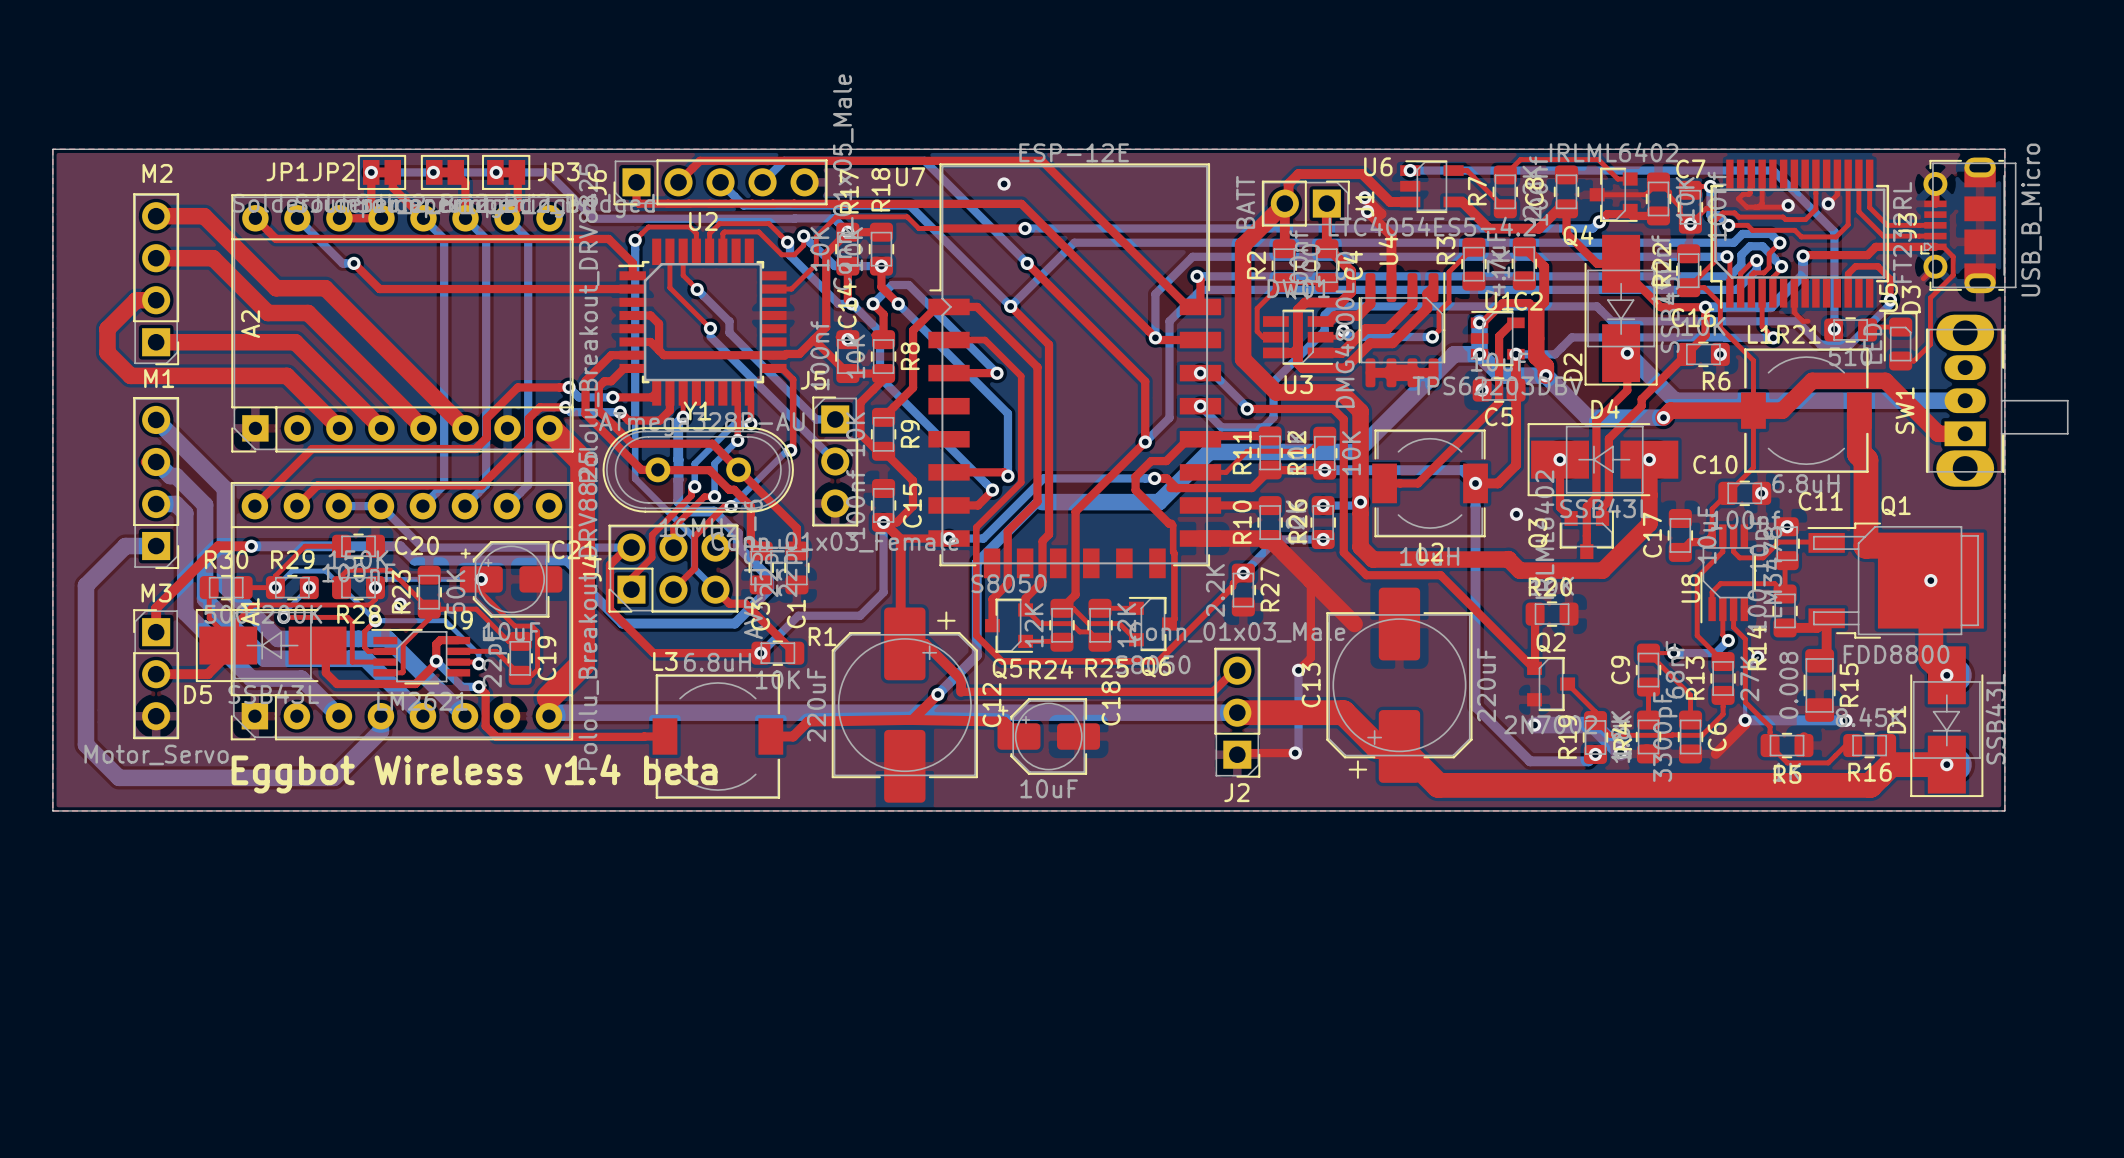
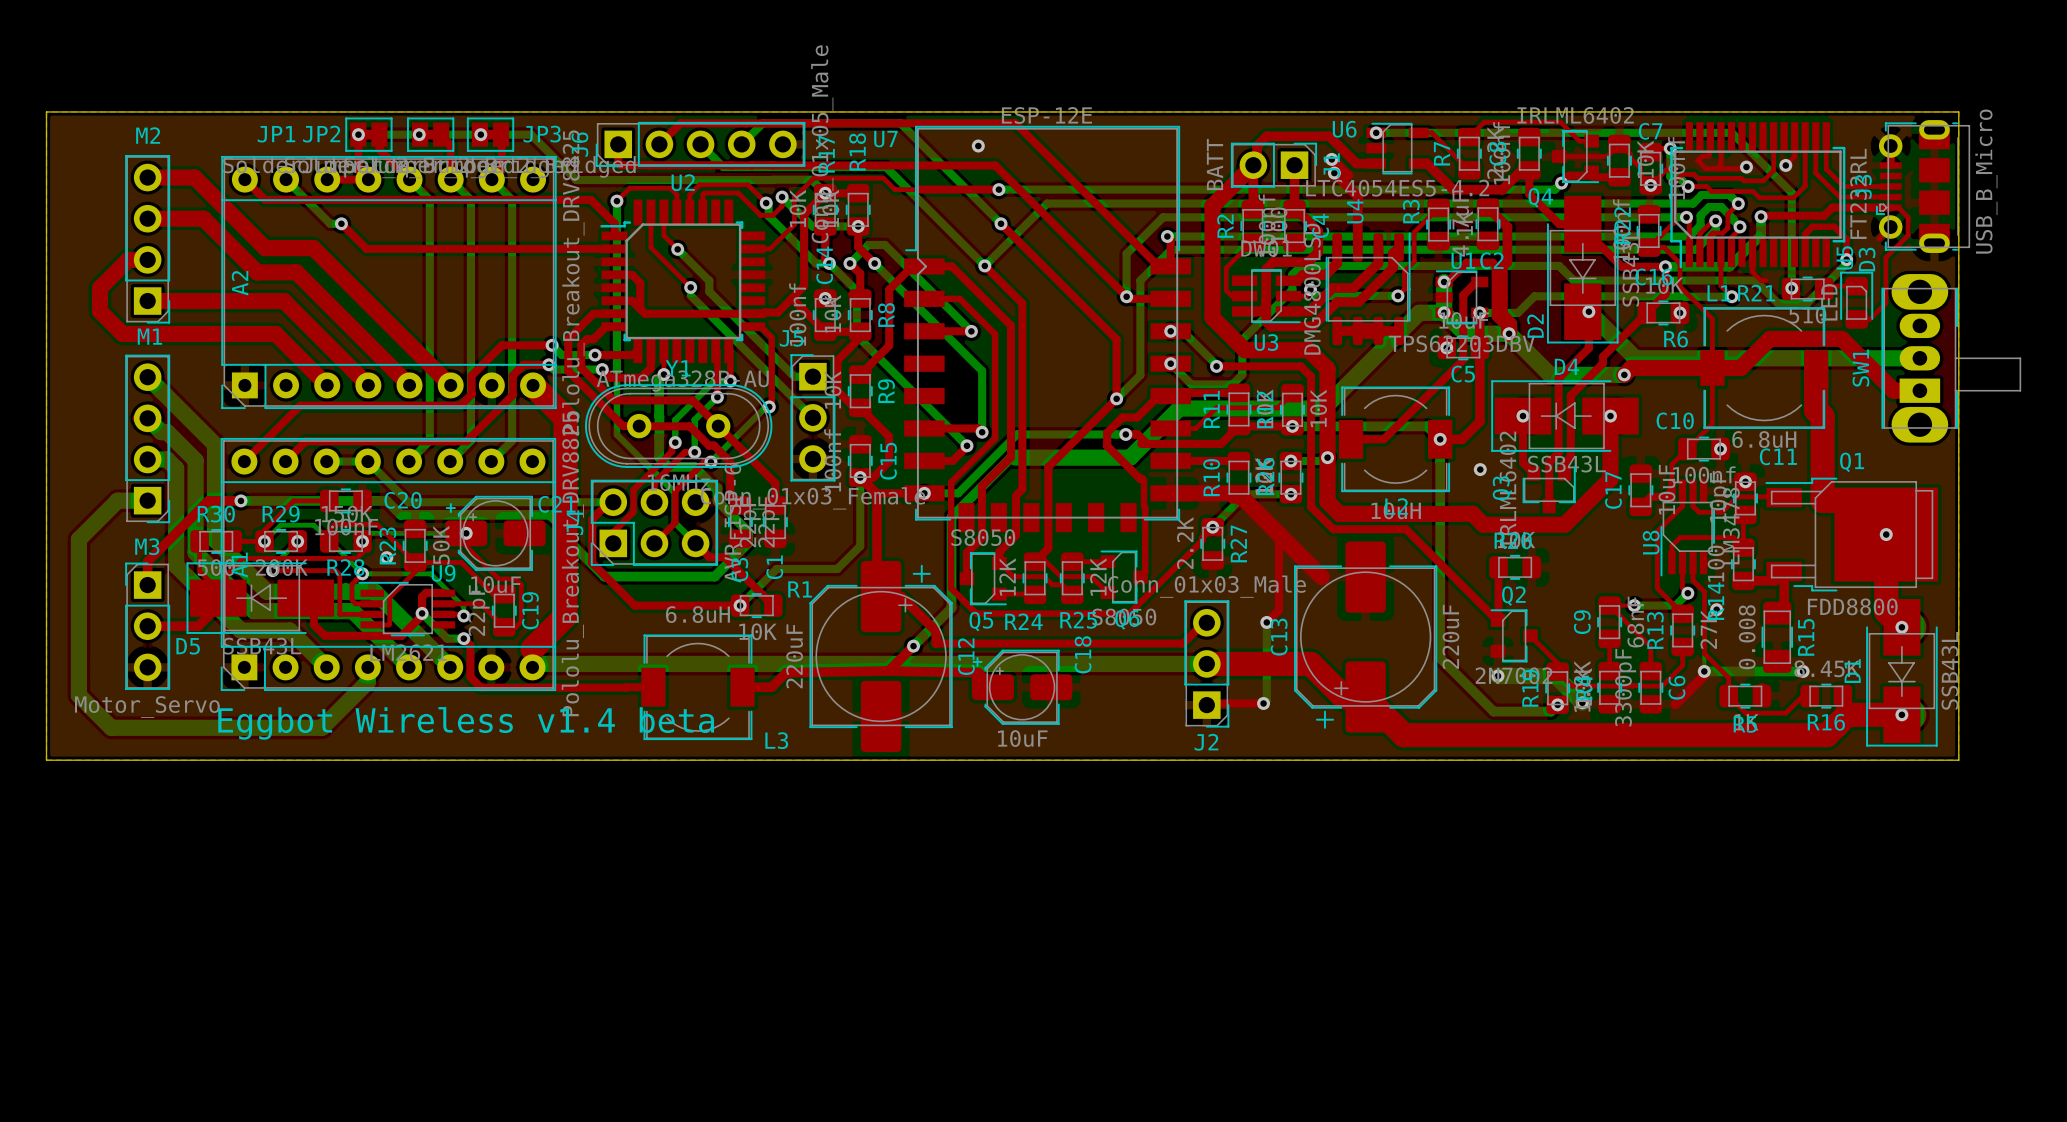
L3 name position: L3 (665, 661) -> L3 (776, 740)
L3 footprint: [652, 674, 784, 799] -> [641, 634, 755, 741]

